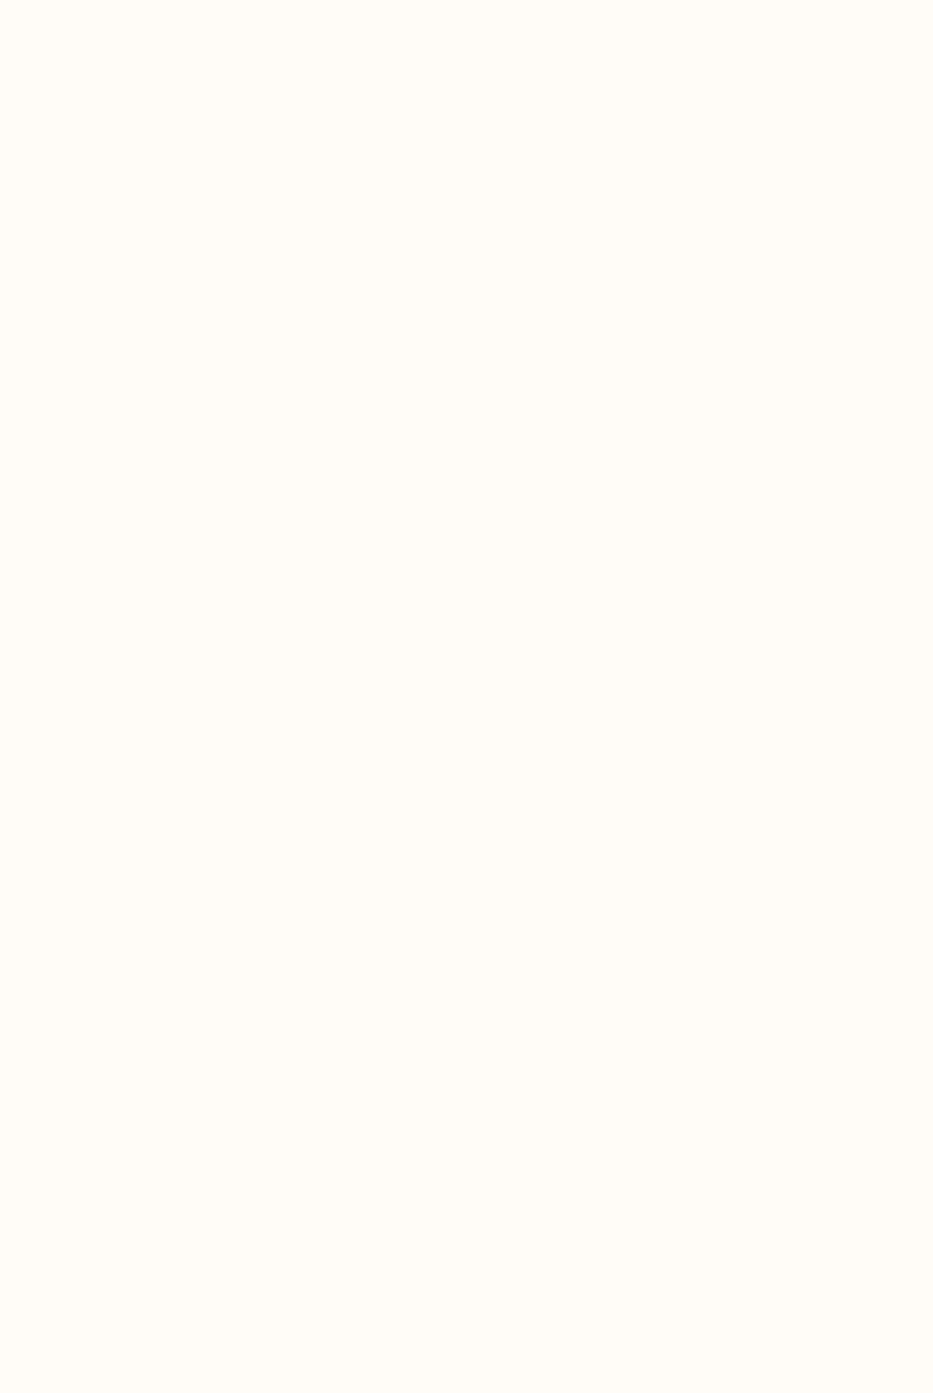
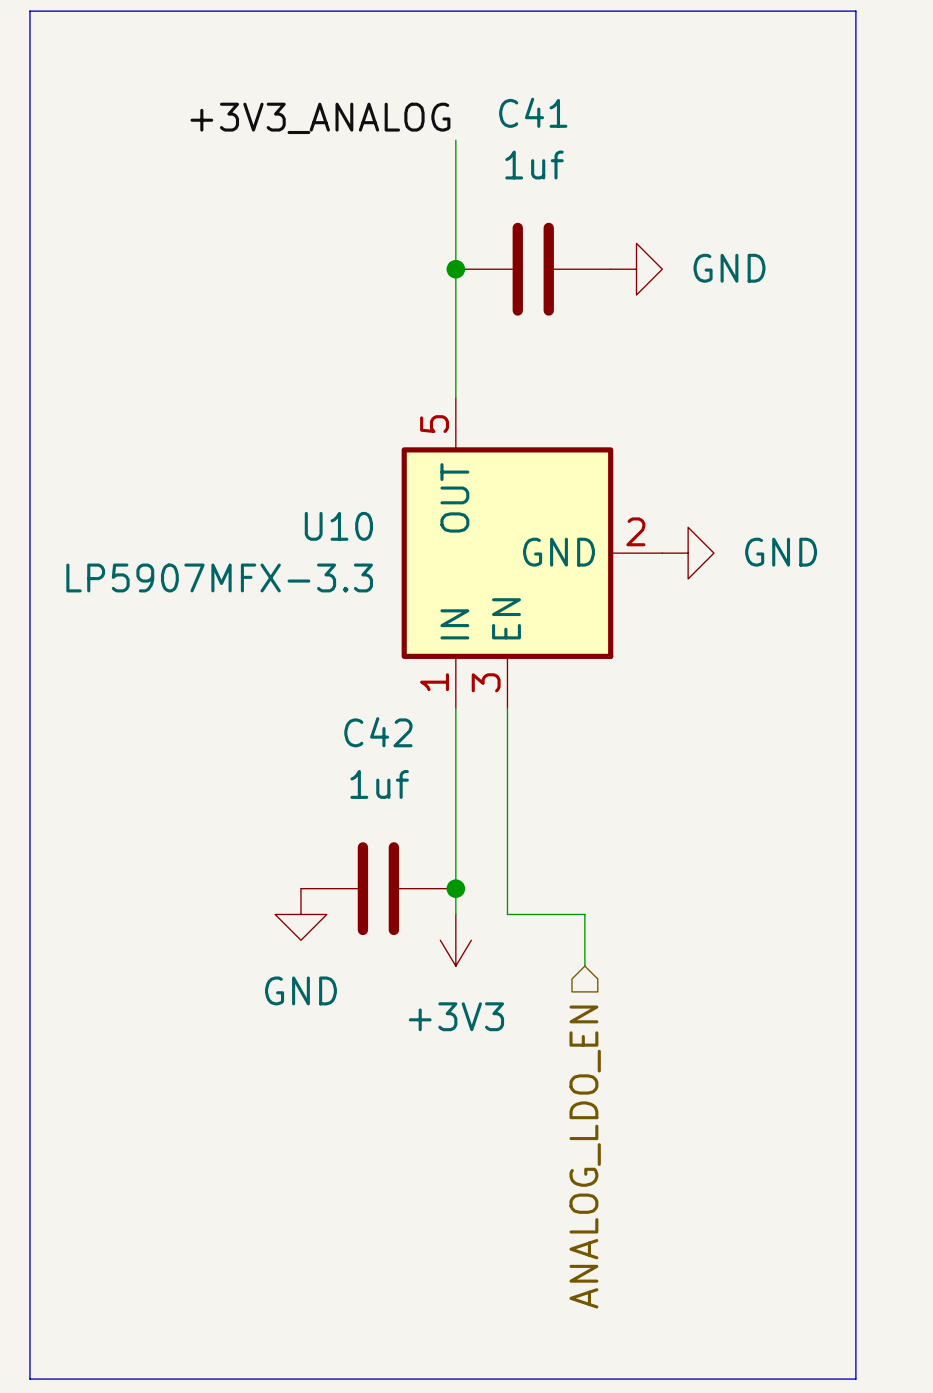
line: none -> (29, 11) (855, 11) (855, 1379) (29, 1379) (29, 11)
label: none -> +3V3_ANALOG (320, 118)
wire: none -> (455, 140) (455, 398)
junction: none -> (455, 269)
C41: none -> 1uf (533, 269)
power symbol: none -> GND (636, 269)
U10: none -> LP5907MFX-3.3 (531, 553)
power symbol: none -> GND (688, 553)
wire: none -> (455, 707) (455, 914)
wire: none -> (507, 707) (507, 914) (584, 914) (584, 966)
C42: none -> 1uf (378, 888)
junction: none -> (455, 888)
power symbol: none -> GND (300, 914)
power symbol: none -> +3V3 (455, 940)
hierarchical label: none -> ANALOG_LDO_EN (585, 1157)

